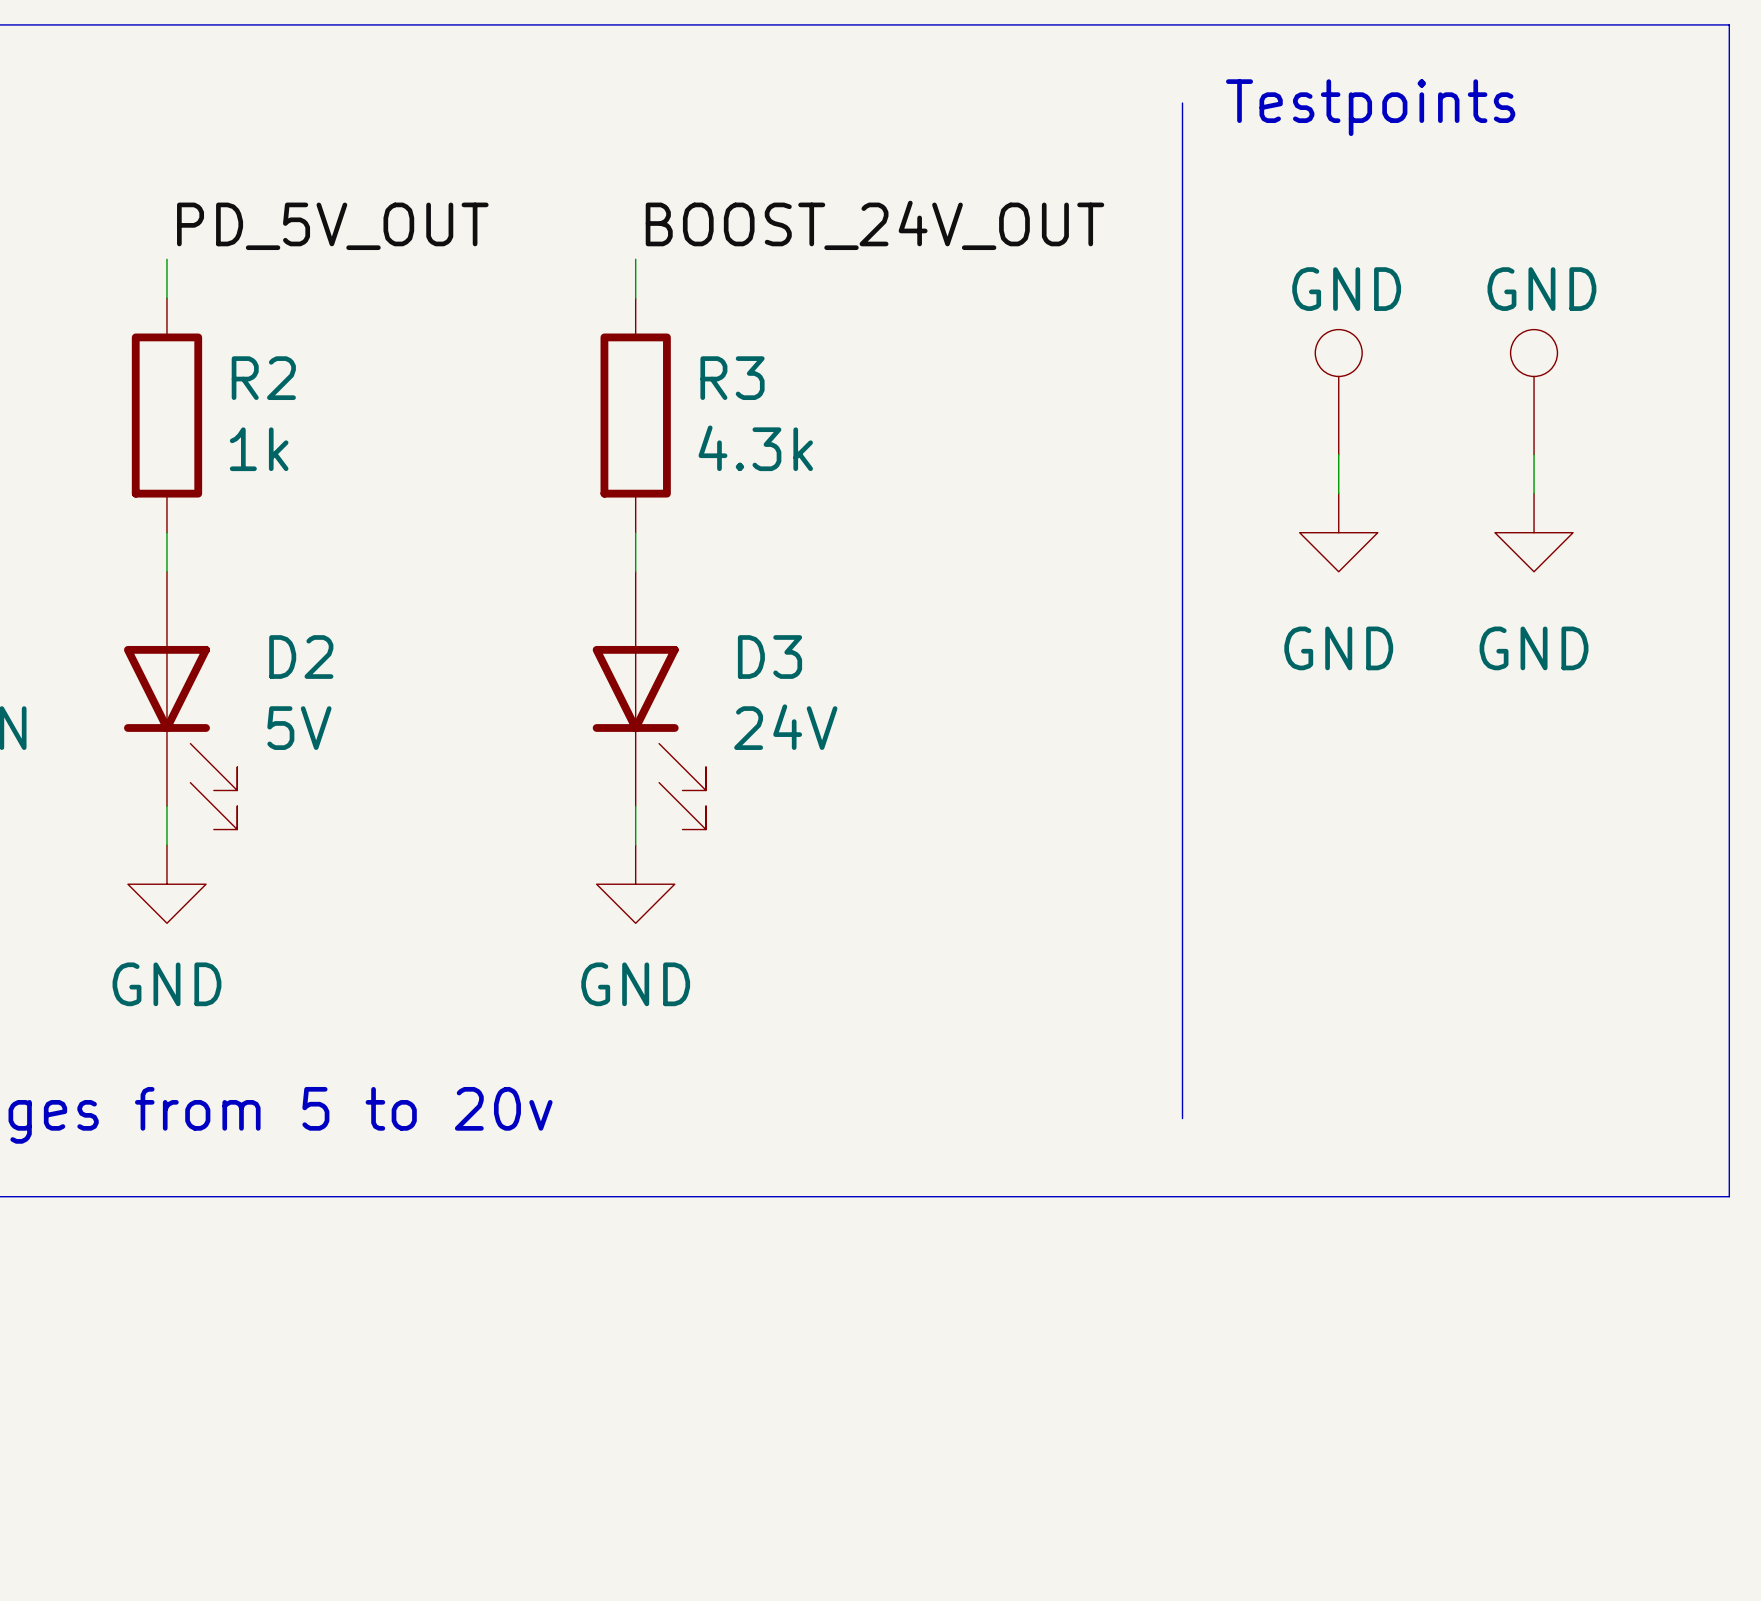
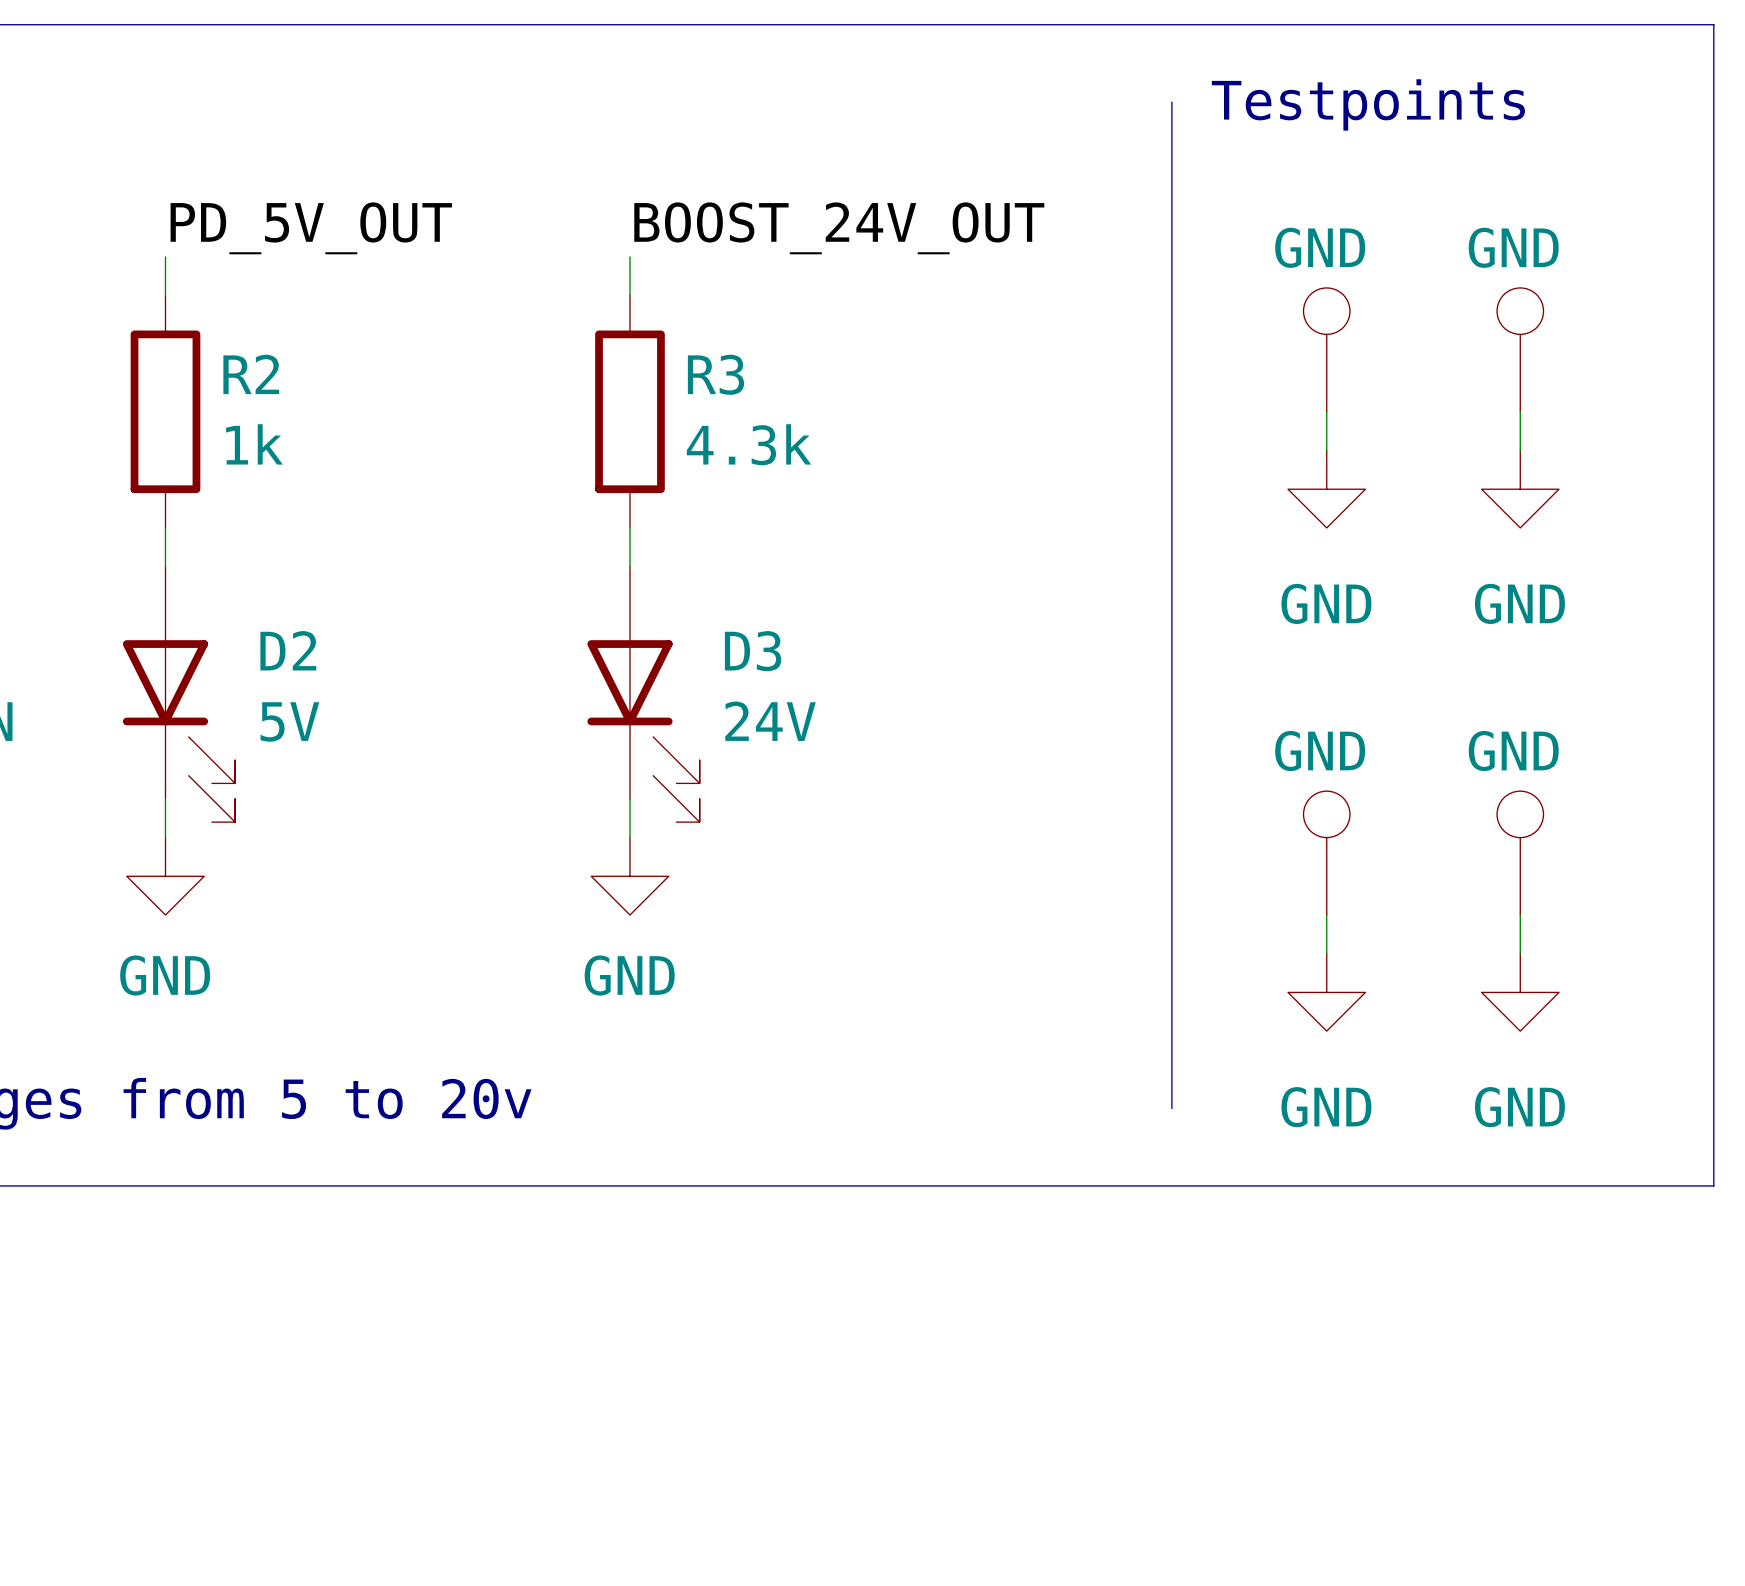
part position: (1338, 392) -> (1326, 349)
part position: (1534, 392) -> (1520, 349)
power symbol position: GND (1338, 532) -> GND (1326, 489)
power symbol position: GND (1534, 532) -> GND (1520, 489)
part: none -> GND (1326, 853)
part: none -> GND (1520, 853)
wire: none -> (1326, 915) (1326, 953)
wire: none -> (1520, 915) (1520, 953)
power symbol: none -> GND (1326, 992)
power symbol: none -> GND (1520, 992)

